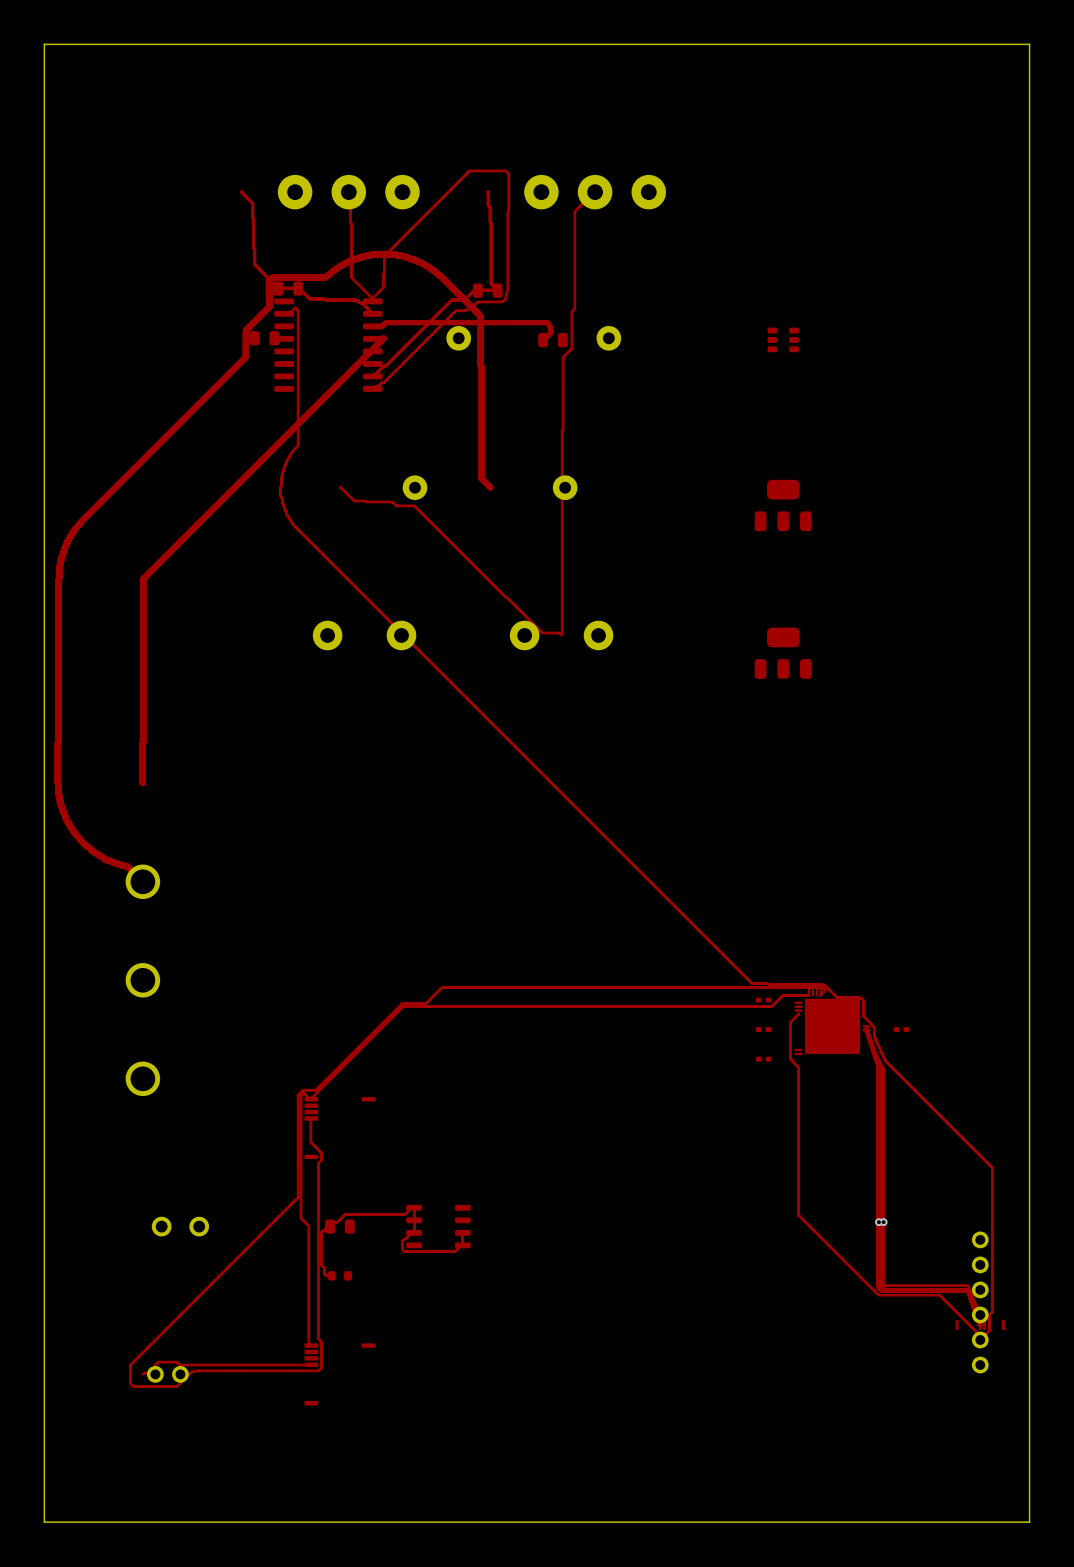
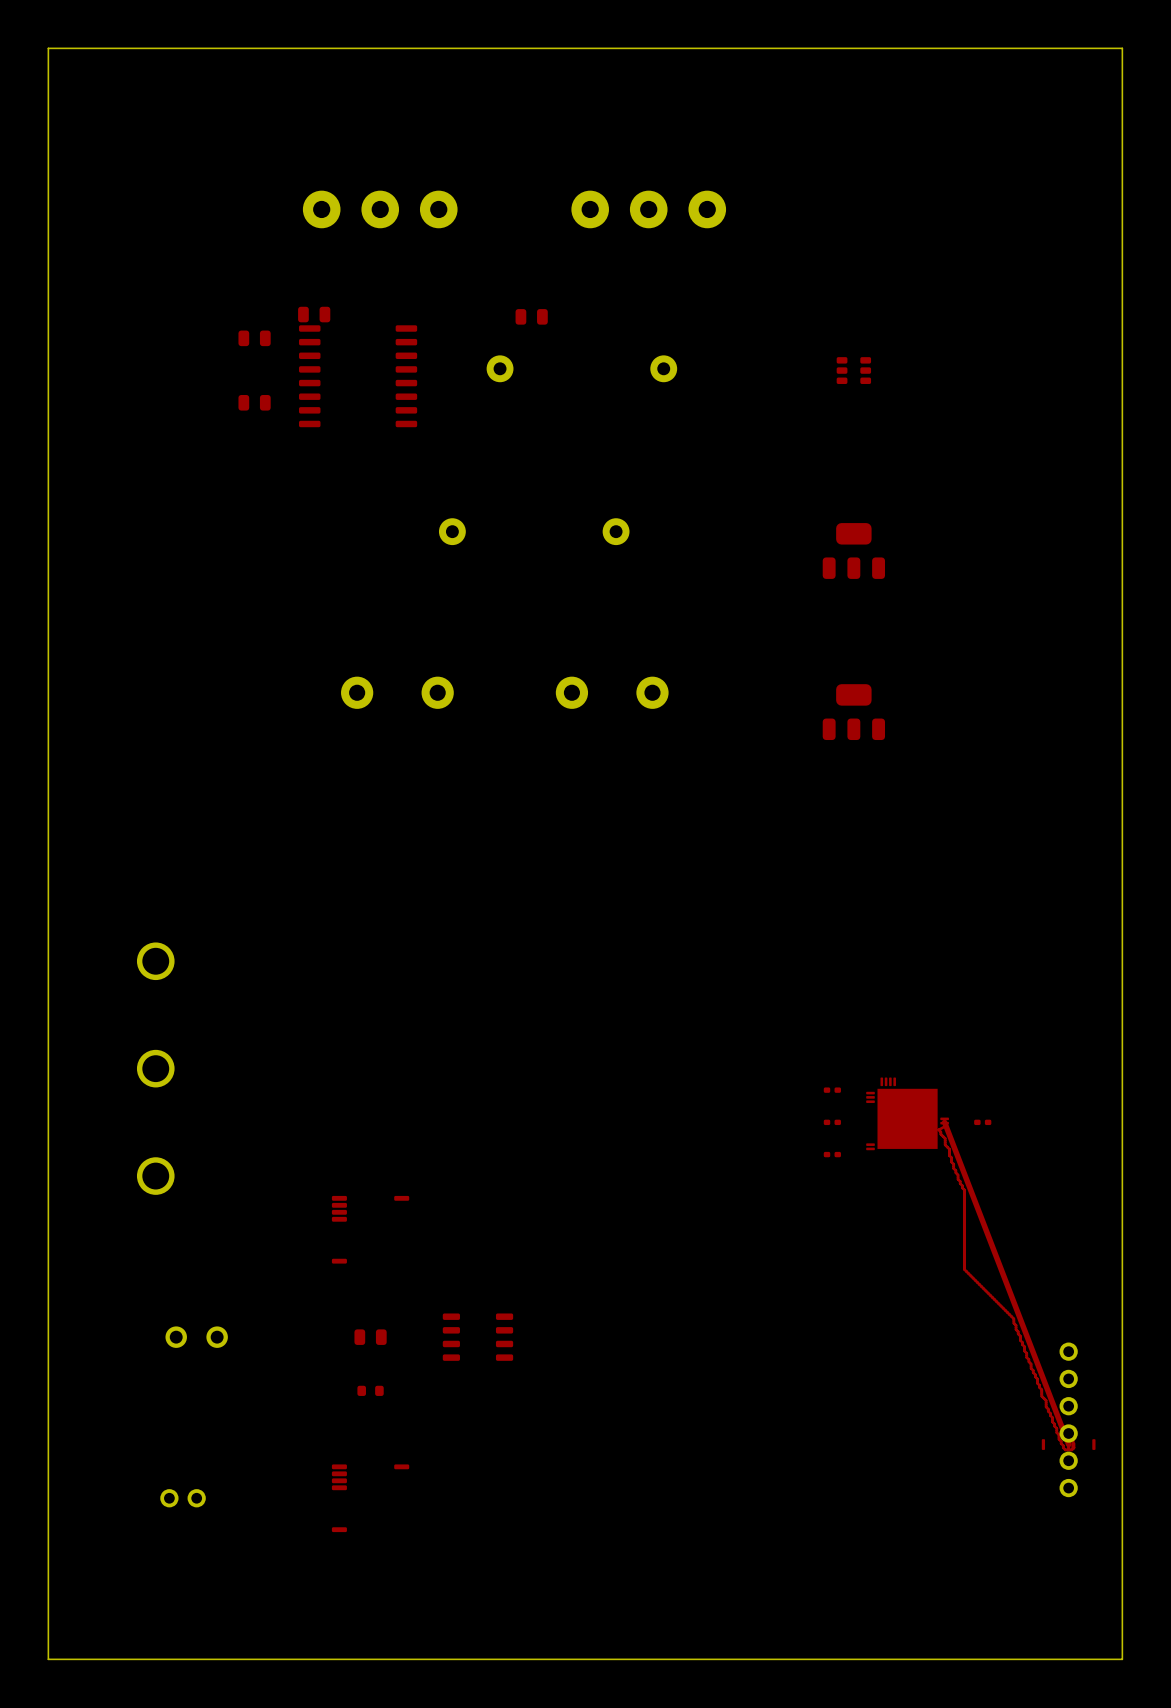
track: (241, 192) (252, 203) (254, 264) (278, 288) (299, 288) (309, 299) (355, 300) (362, 302) (372, 313) -> none
track: (348, 192) (348, 205) (350, 207) (351, 223) (351, 277) (373, 300) (373, 297) (383, 287) (384, 255) (469, 170) (505, 170) (508, 173) (507, 290) (505, 299) (501, 301) (477, 301) (468, 309) (455, 310) (383, 382) (372, 388) -> none
track: (487, 192) (491, 223) (491, 284) (497, 290) (474, 290) (464, 300) (451, 300) (385, 366) (372, 376) -> none
track: (595, 192) (574, 211) (574, 308) (571, 311) (571, 348) (563, 357) (562, 634) (542, 633) (414, 505) (396, 505) (392, 501) (354, 501) (339, 487) -> none
part: none -> (254, 338)
track: (284, 313) (289, 313) (295, 307) (298, 310) (298, 445) (286, 461) (280, 487) (282, 502) (292, 523) (752, 983) (823, 984) (836, 997) (859, 997) (863, 1000) (863, 1016) (874, 1028) (874, 1036) (885, 1060) (992, 1167) (992, 1311) (989, 1314) (989, 1330) (986, 1333) (977, 1333) (939, 1295) (877, 1294) (798, 1215) (798, 1067) (790, 1058) (790, 1022) (798, 1013) -> none
track: (372, 326) (381, 326) (385, 322) (547, 322) (551, 332) (543, 340) -> none
part: (264, 338) -> none
track: (383, 338) (143, 578) (142, 783) -> none
part: (553, 340) -> none
part: none -> (254, 402)
track: (490, 487) (481, 478) (480, 315) (439, 275) (414, 259) (383, 253) (366, 255) (348, 261) (325, 277) (273, 277) (269, 280) (269, 306) (245, 330) (245, 357) (80, 522) (68, 539) (60, 561) (58, 578) (57, 743) (57, 782) (60, 804) (70, 827) (87, 846) (106, 860) (127, 866) (142, 881) -> none
track: (808, 995) (782, 995) (771, 1006) (403, 1006) (310, 1099) (303, 1093) (301, 1096) (301, 1218) (308, 1226) (308, 1343) (311, 1345) -> none
track: (820, 995) (825, 990) (822, 987) (441, 987) (426, 1003) (402, 1003) (315, 1090) (302, 1090) (298, 1095) (298, 1197) (130, 1365) (130, 1383) (133, 1386) (176, 1386) (191, 1371) (195, 1370) (318, 1370) (321, 1367) (321, 1342) (318, 1339) (318, 1163) (321, 1160) (321, 1153) (310, 1142) (311, 1118) -> none
track: (866, 1029) (879, 1068) (878, 1288) (882, 1290) (967, 1290) (980, 1325) -> (944, 1122) (1068, 1444)
track: (866, 1033) (883, 1068) (883, 1288) (882, 1285) (967, 1285) (984, 1324) -> (944, 1126) (938, 1129) (945, 1138) (945, 1144) (949, 1149) (953, 1168) (964, 1190) (964, 1269) (1013, 1318) (1016, 1329) (1041, 1389) (1041, 1396) (1046, 1400) (1046, 1406) (1056, 1428) (1058, 1439) (1065, 1449) (1071, 1449) (1074, 1443)
via: (878, 1222) -> none
via: (883, 1222) -> none
track: (462, 1233) (462, 1245) (454, 1251) (404, 1251) (402, 1249) (402, 1240) (411, 1233) (414, 1233) (414, 1207) (405, 1214) (345, 1214) (337, 1222) (333, 1222) (321, 1232) (321, 1265) (324, 1268) (324, 1274) (331, 1275) -> none
track: (311, 1364) (179, 1365) (176, 1362) (158, 1362) (155, 1365) (154, 1372) (142, 1374) -> none

